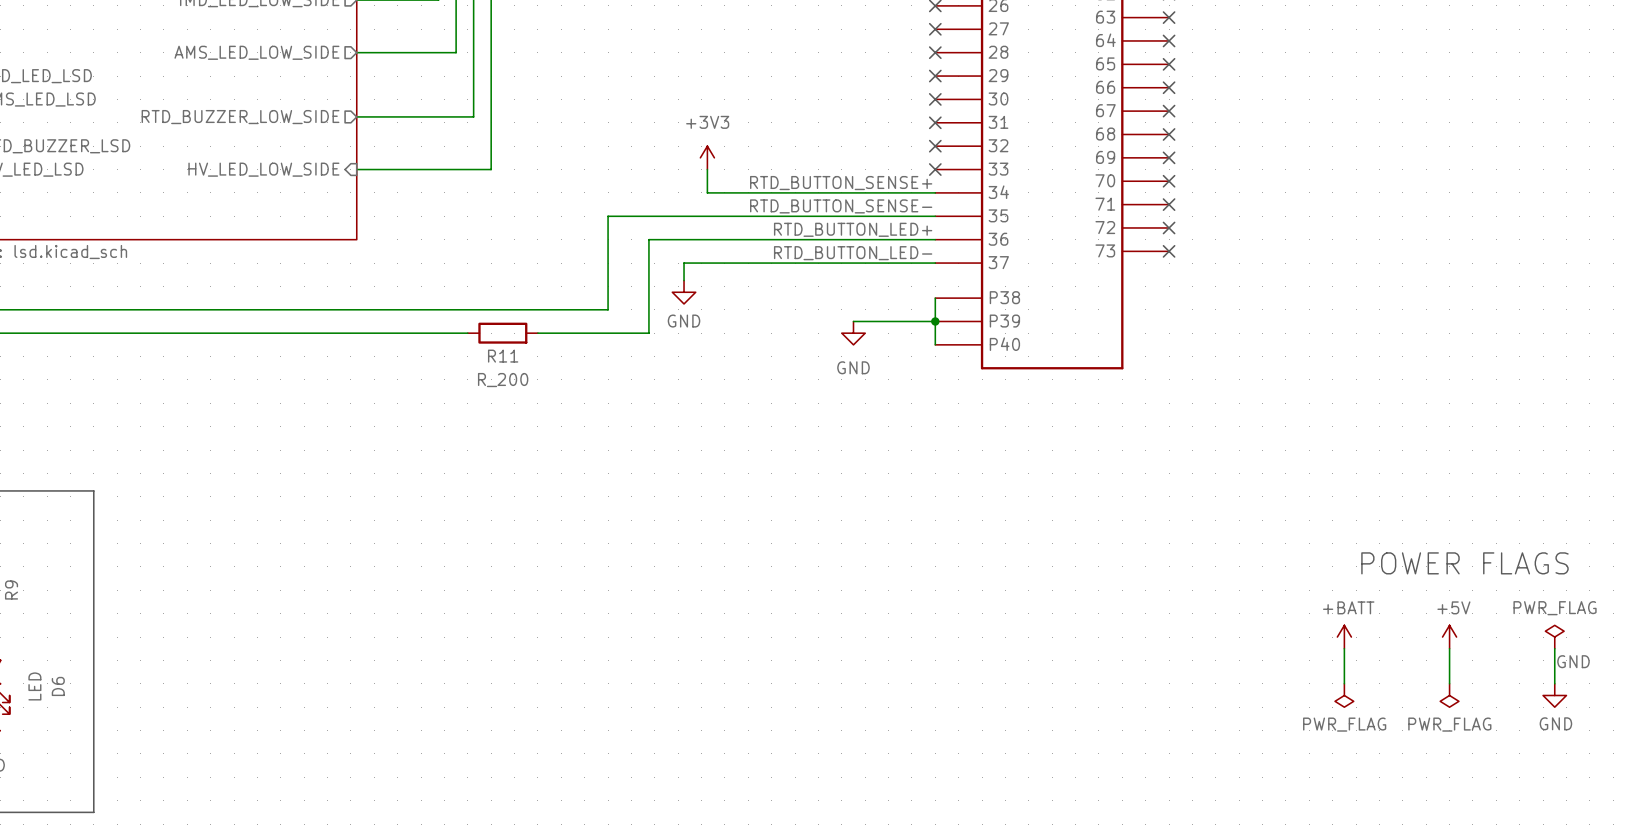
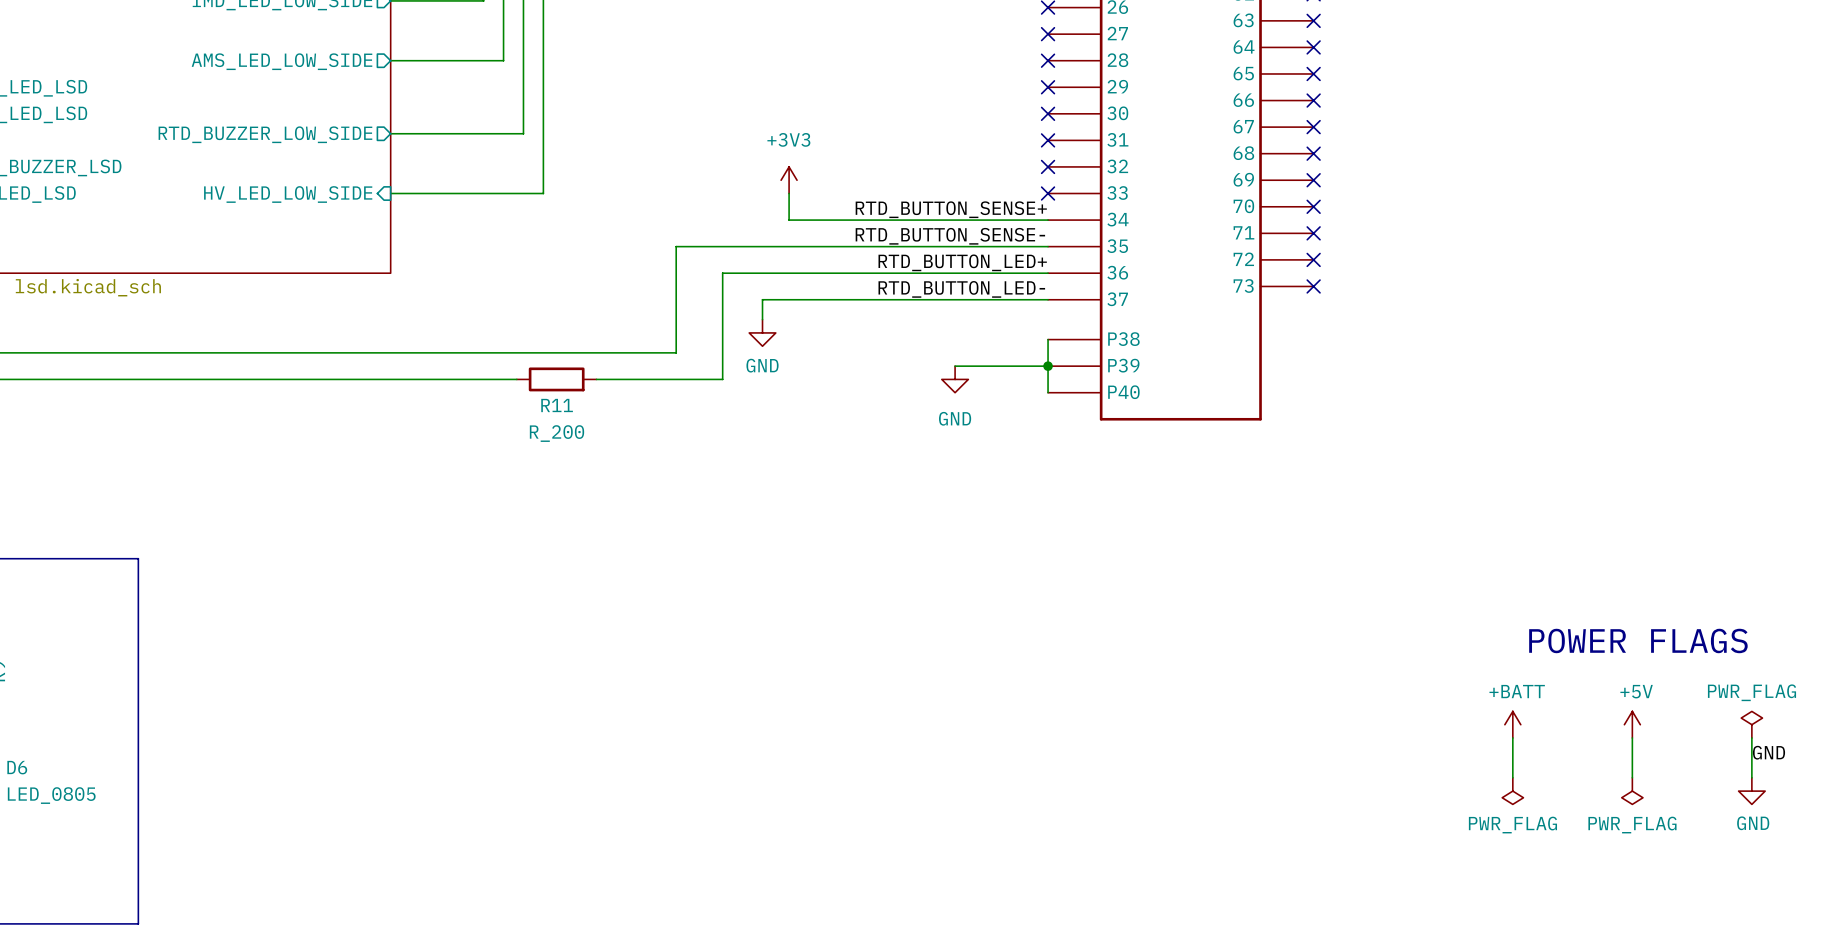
line: (93, 490) (93, 812) -> (91, 558) (138, 558) (138, 923) (91, 923)
D6 value: LED (34, 686) -> LED_0805 (51, 795)
D6 name rotation: 0° (58, 686) -> 90° clockwise (17, 767)

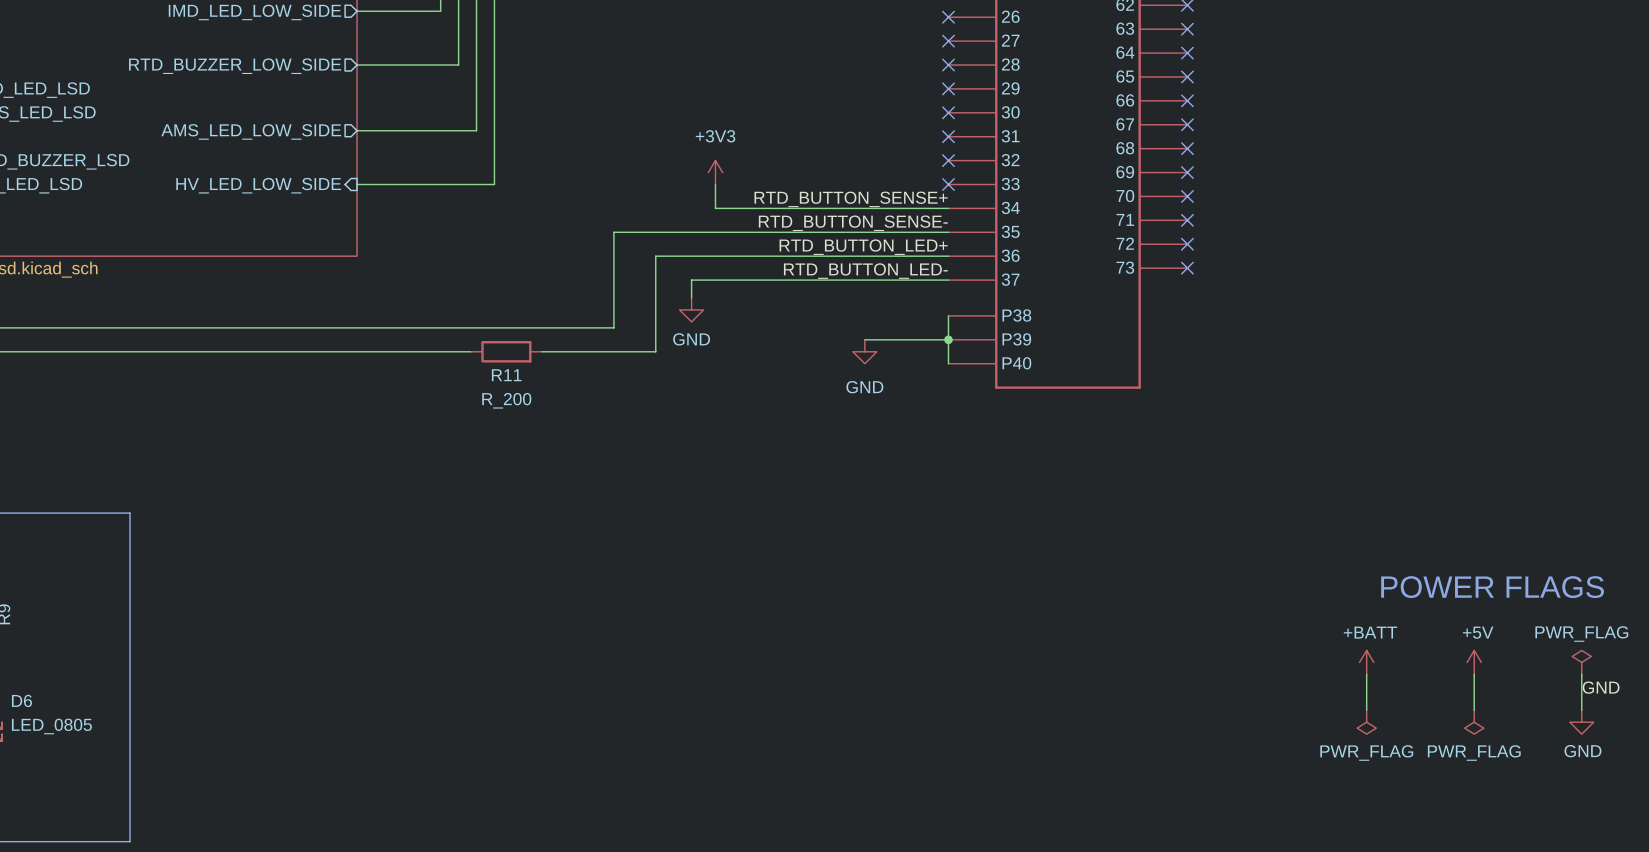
sheet pin: AMS_LED_LOW_SIDE (282, 61) -> RTD_BUZZER_LOW_SIDE (235, 66)
sheet pin: RTD_BUZZER_LOW_SIDE (265, 134) -> AMS_LED_LOW_SIDE (251, 131)

